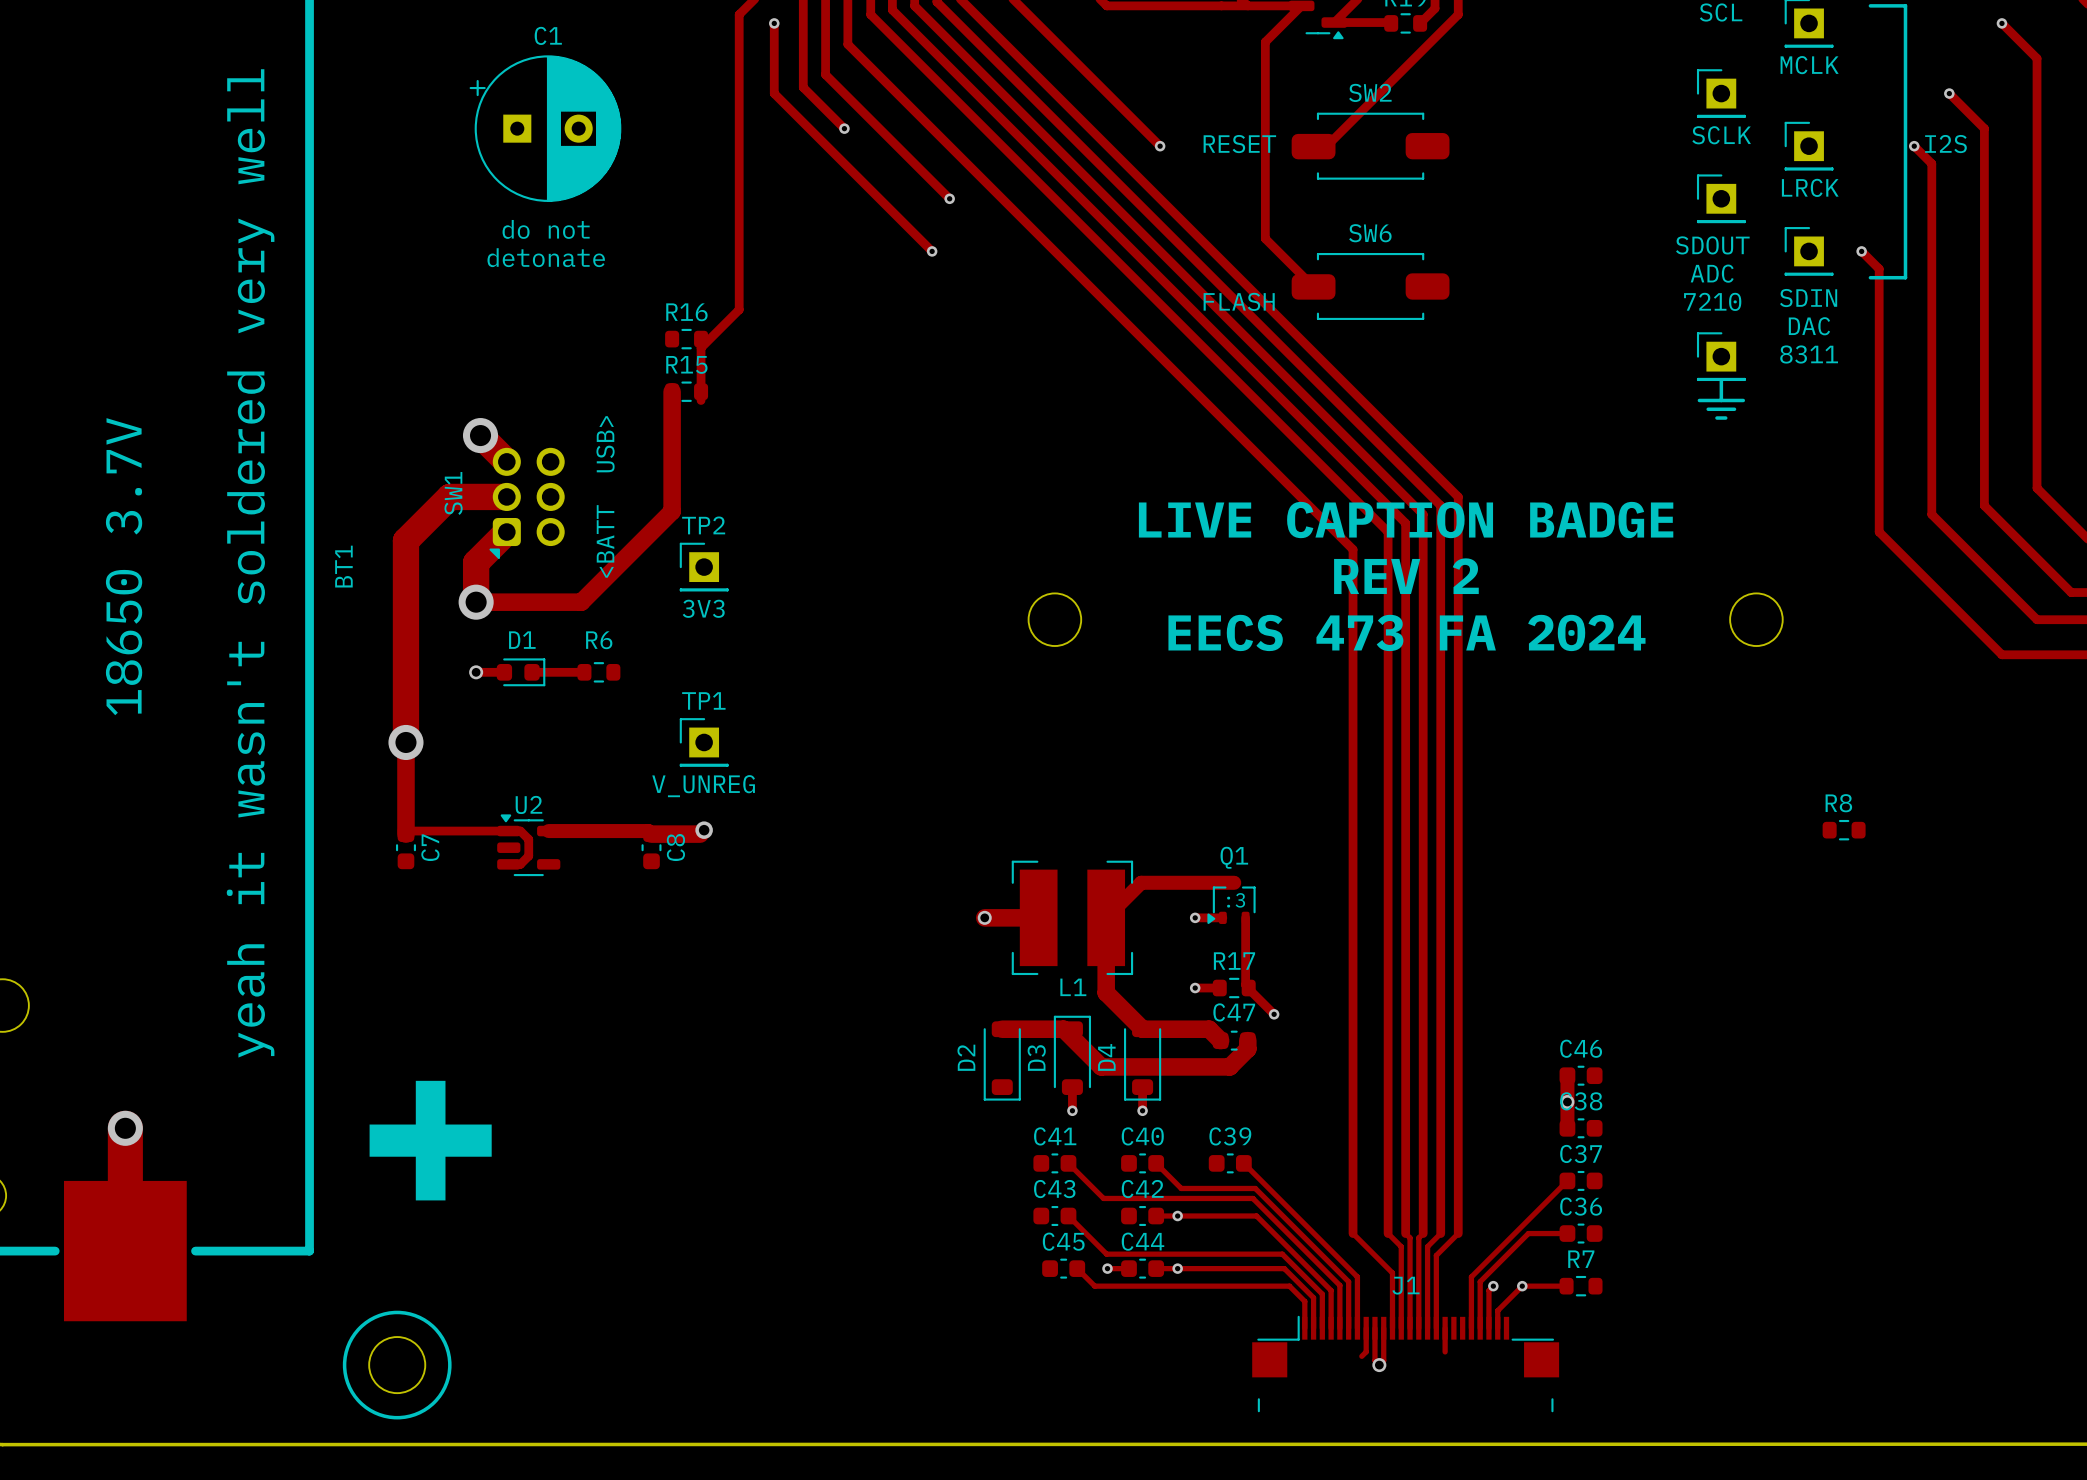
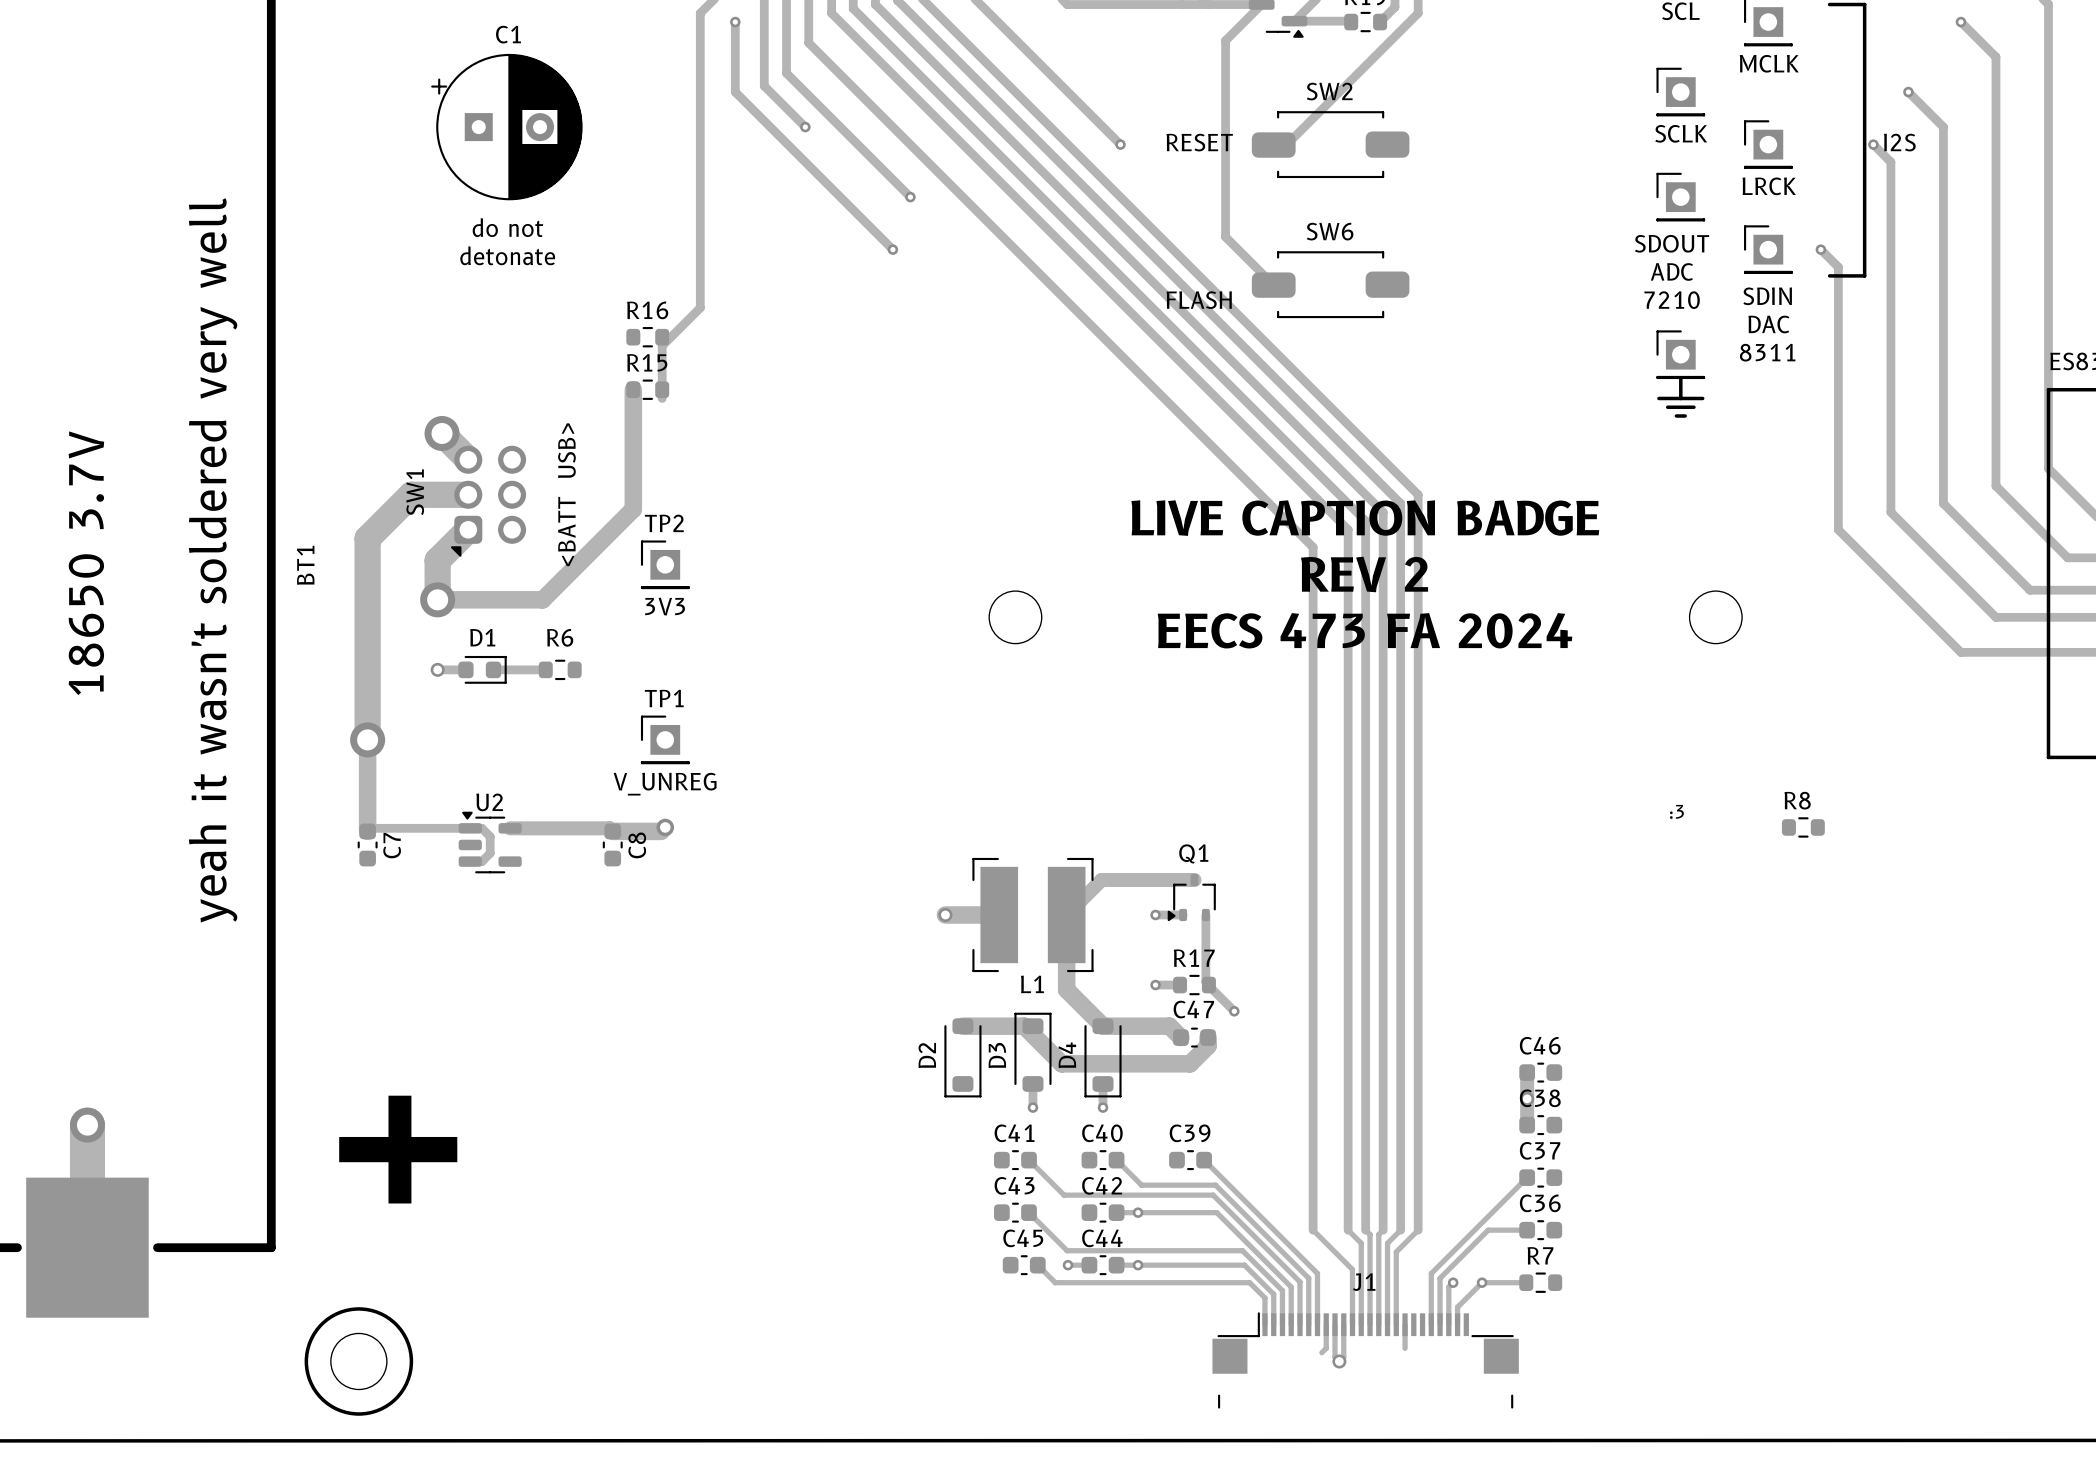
text: none -> :3 (1676, 811)
text: :3 (1236, 900) -> none

